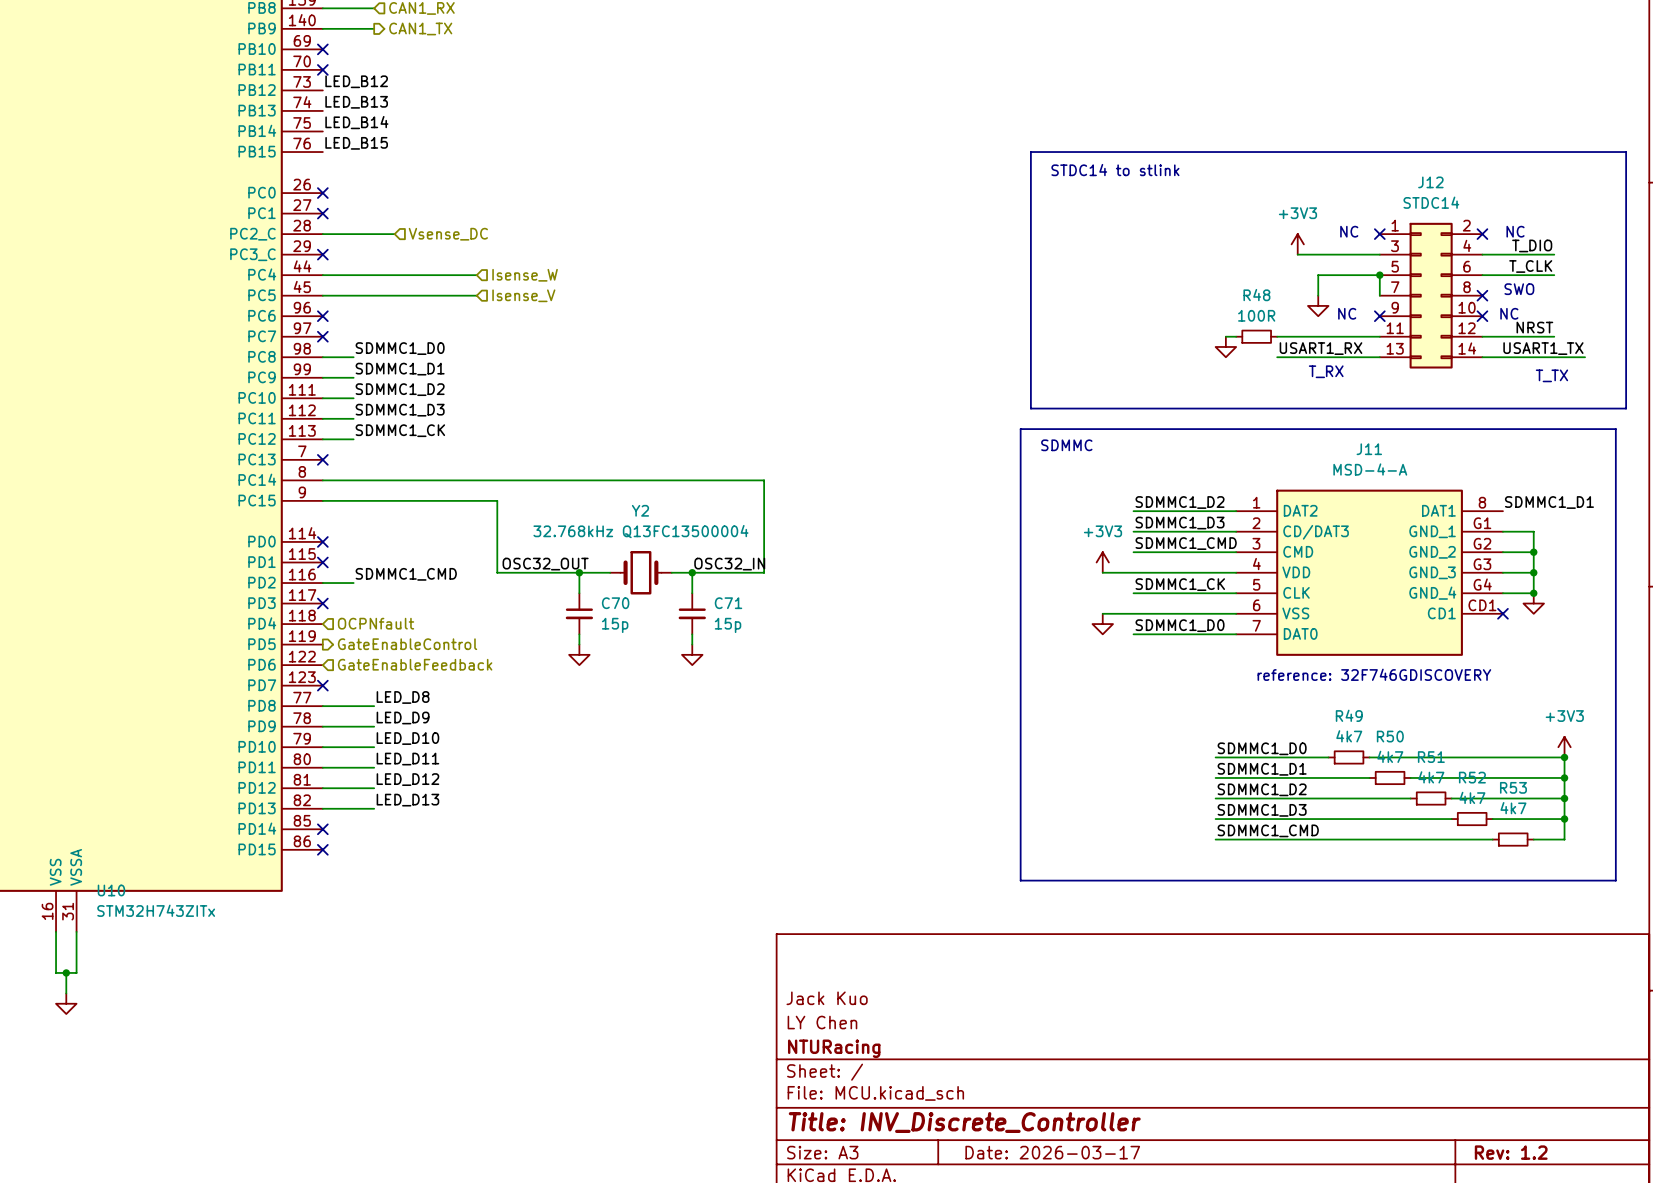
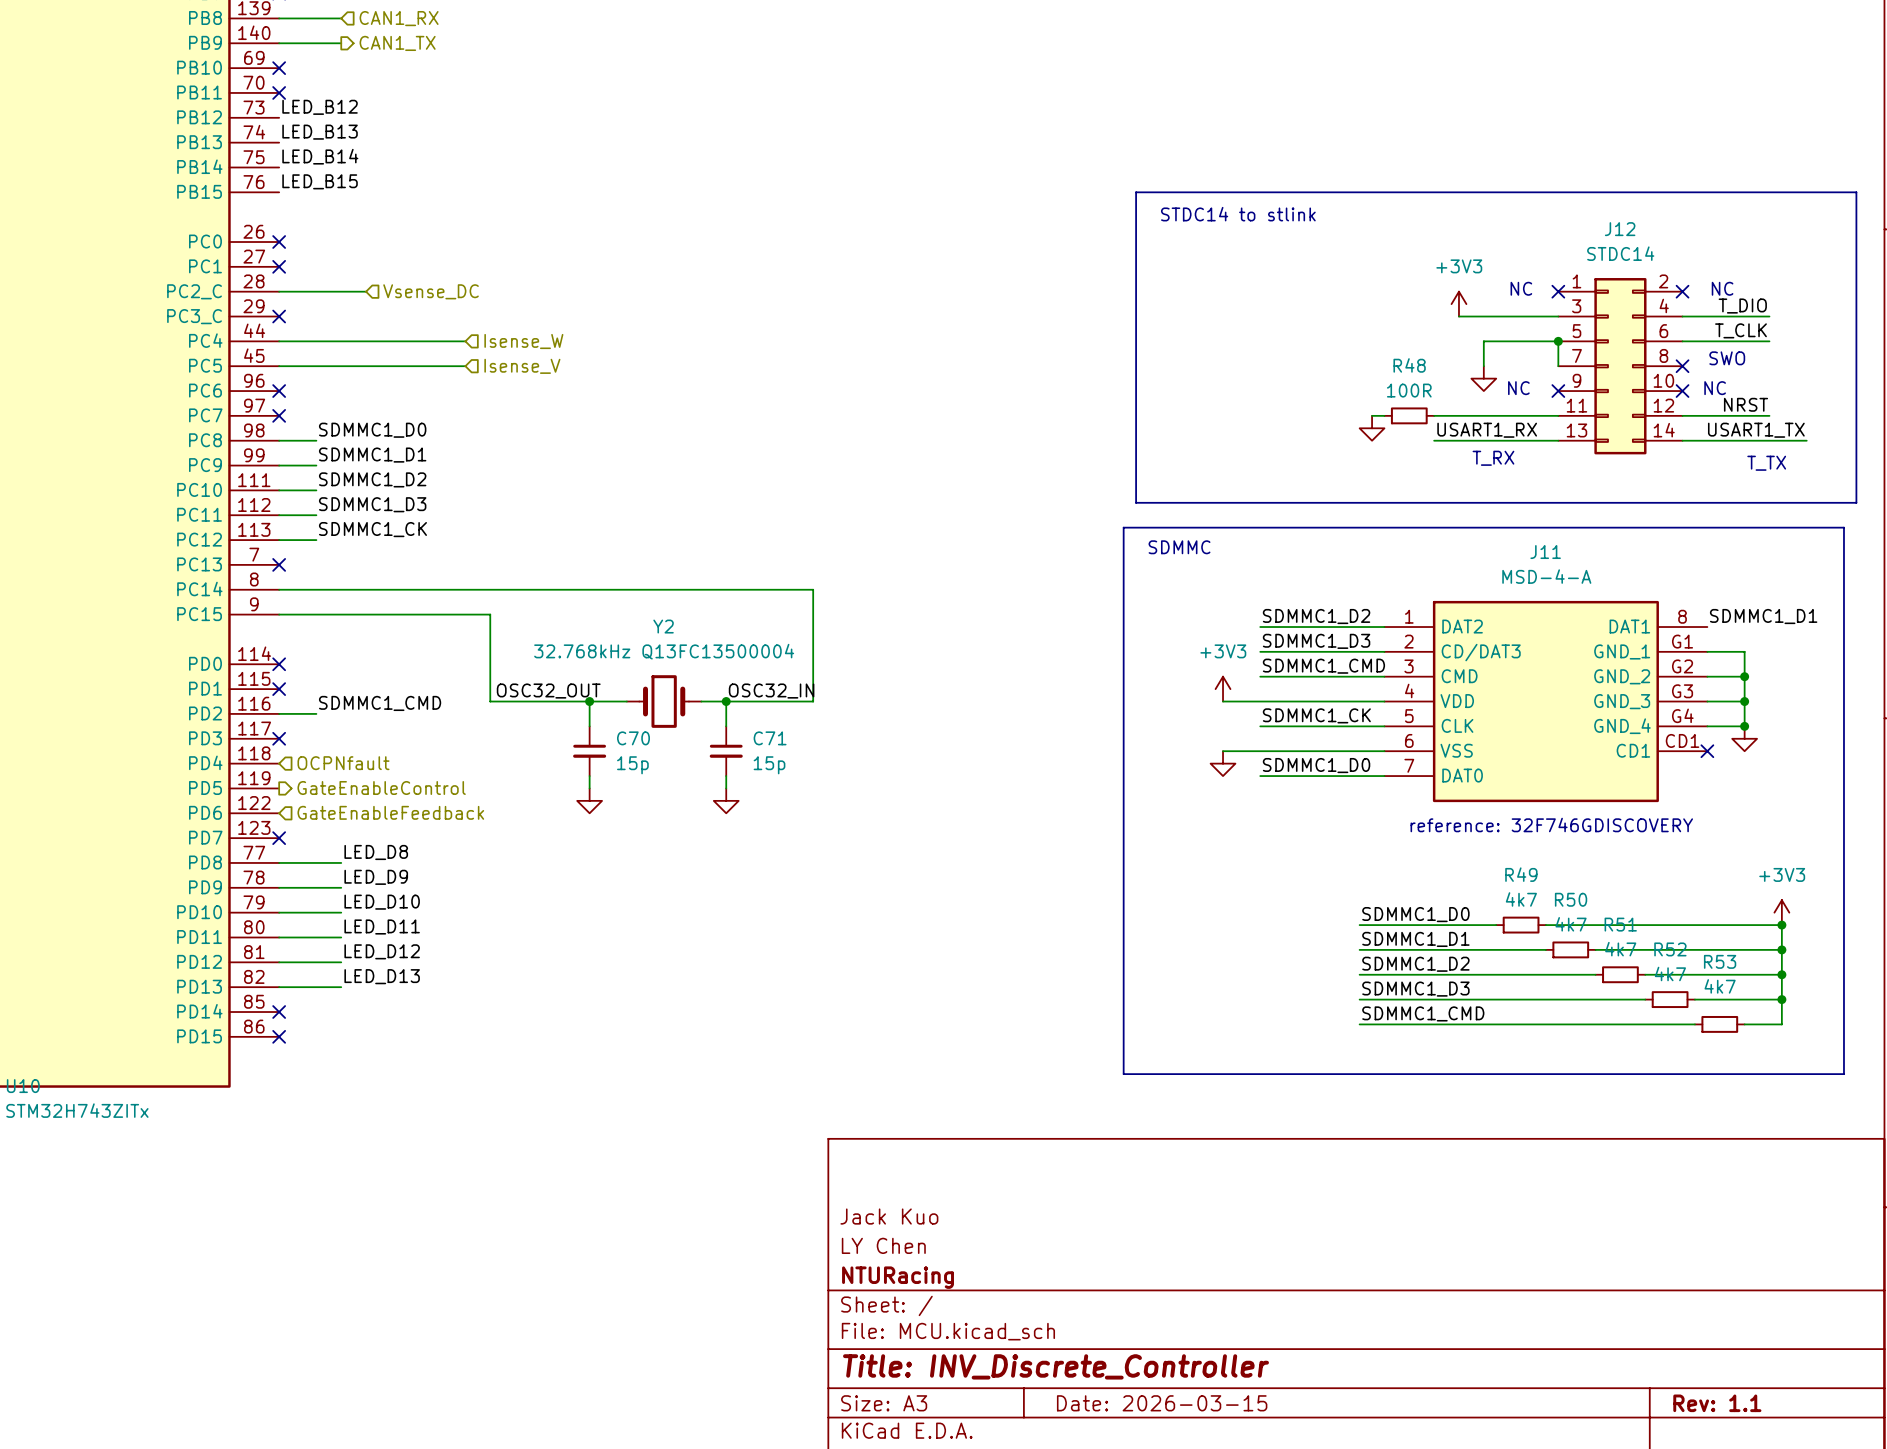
title block: Date: 2026-03-17 (1052, 1152) -> Date: 2026-03-15 (1162, 1403)
title block: Rev: 1.2 (1511, 1152) -> Rev: 1.1 (1717, 1403)

